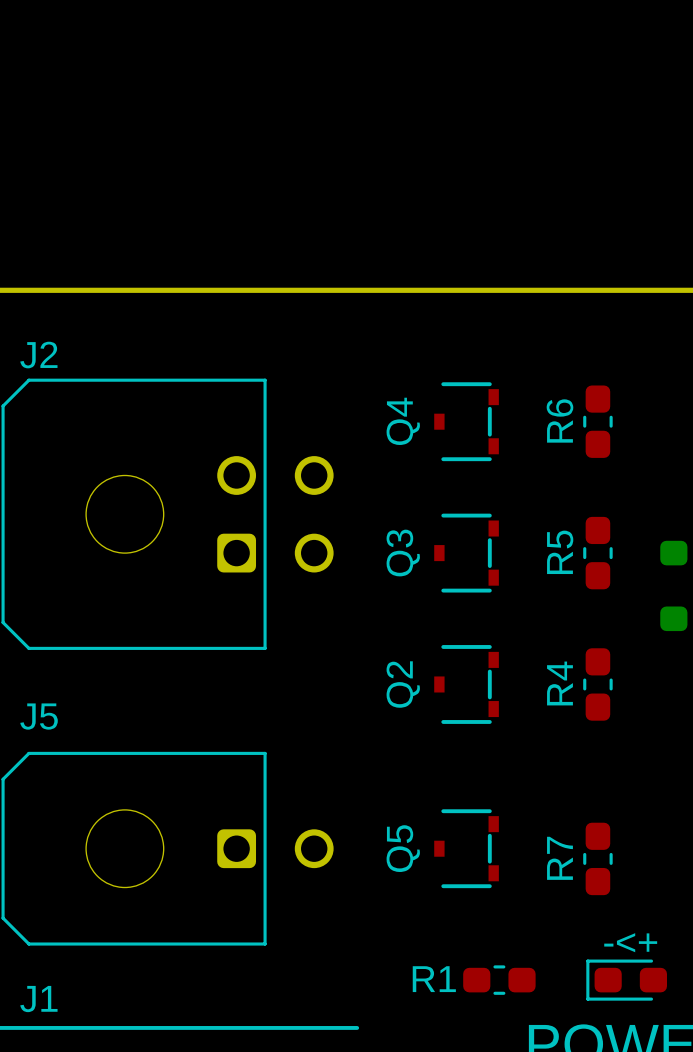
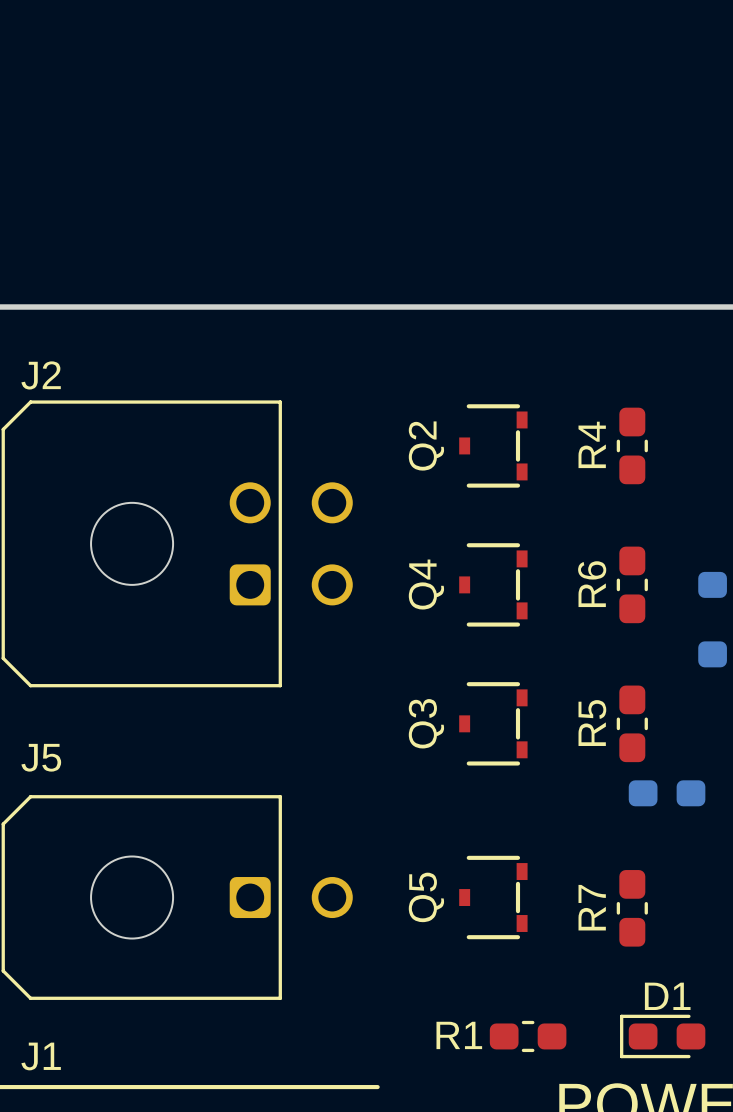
R6 name: R6 (559, 420) -> R4 (592, 444)
Q4 name: Q4 (403, 421) -> Q2 (426, 446)
R5 name: R5 (560, 552) -> R6 (592, 584)
Q3 name: Q3 (403, 553) -> Q4 (426, 584)
R4 name: R4 (559, 683) -> R5 (592, 723)
Q2 name: Q2 (403, 684) -> Q3 (426, 723)
part: none -> (667, 793)
D1 name: -<+ (630, 942) -> D1 (667, 996)

